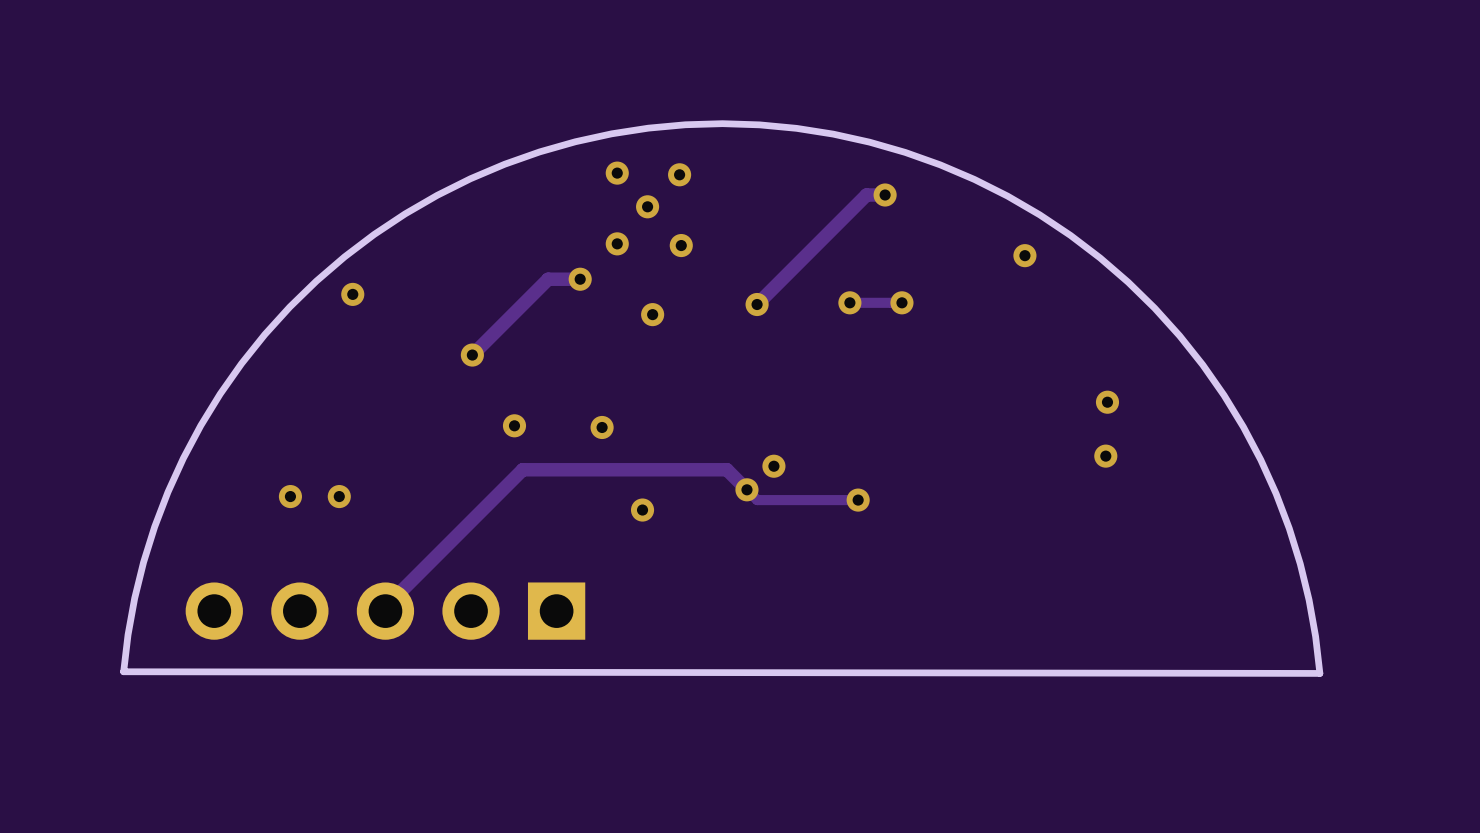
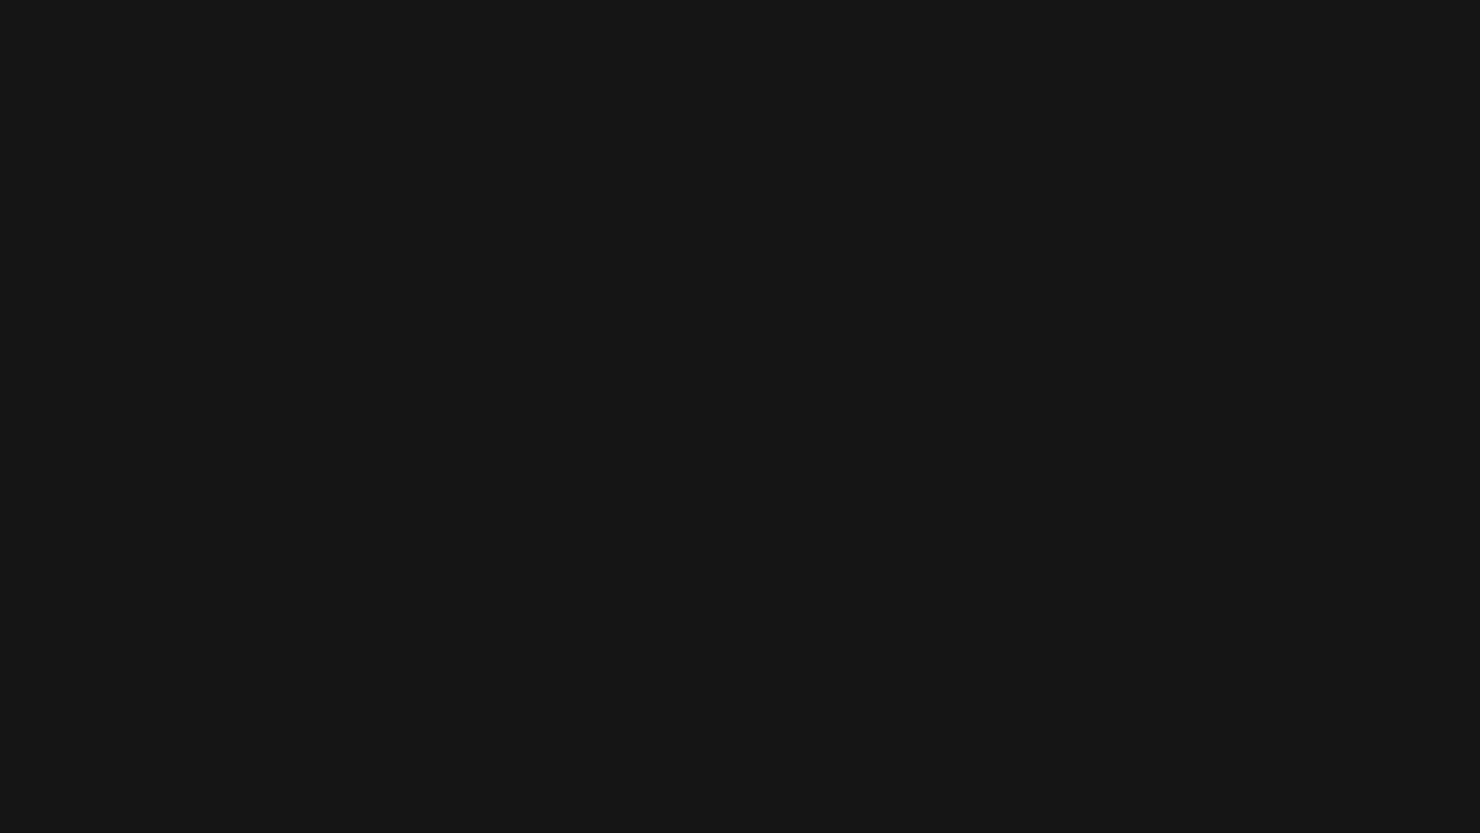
via: (617, 173) -> none
via: (679, 174) -> none
track: (885, 195) (866, 195) (757, 304) -> none
via: (885, 195) -> none
via: (647, 206) -> none
via: (617, 243) -> none
via: (681, 245) -> none
via: (1024, 255) -> none
track: (580, 279) (548, 279) (472, 355) -> none
via: (580, 279) -> none
via: (352, 294) -> none
via: (849, 302) -> none
track: (901, 302) (849, 302) -> none
via: (901, 302) -> none
via: (757, 304) -> none
via: (652, 314) -> none
via: (472, 355) -> none
via: (1107, 402) -> none
via: (514, 425) -> none
via: (602, 427) -> none
via: (1105, 456) -> none
via: (773, 466) -> none
via: (746, 489) -> none
via: (290, 496) -> none
via: (339, 496) -> none
track: (858, 500) (757, 500) (726, 469) (522, 469) (384, 607) -> none
via: (858, 500) -> none
via: (642, 510) -> none
part: (385, 611) -> none
board edge: (123, 671) (1319, 673) (1309, 599) (1300, 563) (1289, 528) (1260, 459) (1243, 427) (1202, 364) (1154, 308) (1128, 282) (1070, 235) (1039, 214) (1007, 196) (940, 164) (869, 142) (833, 134) (759, 124) (722, 123) (685, 124) (611, 133) (539, 151) (504, 164) (470, 178) (405, 213) (374, 234) (316, 281) (264, 334) (241, 363) (200, 425) (183, 458) (167, 492) (143, 562) (128, 634) (123, 671) -> none

